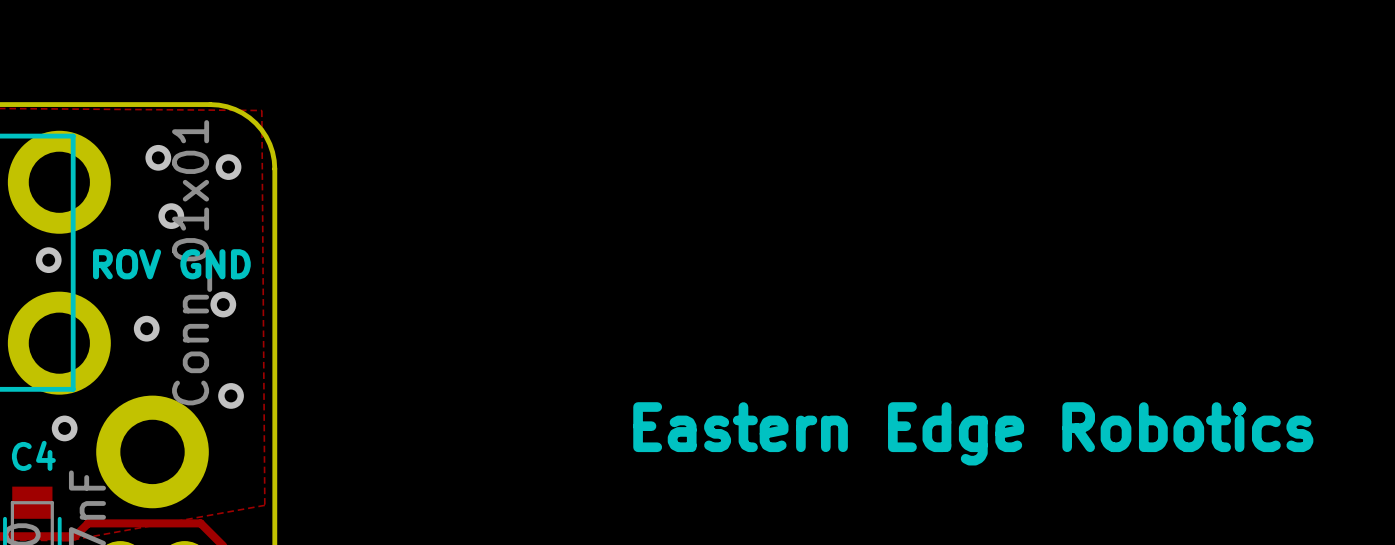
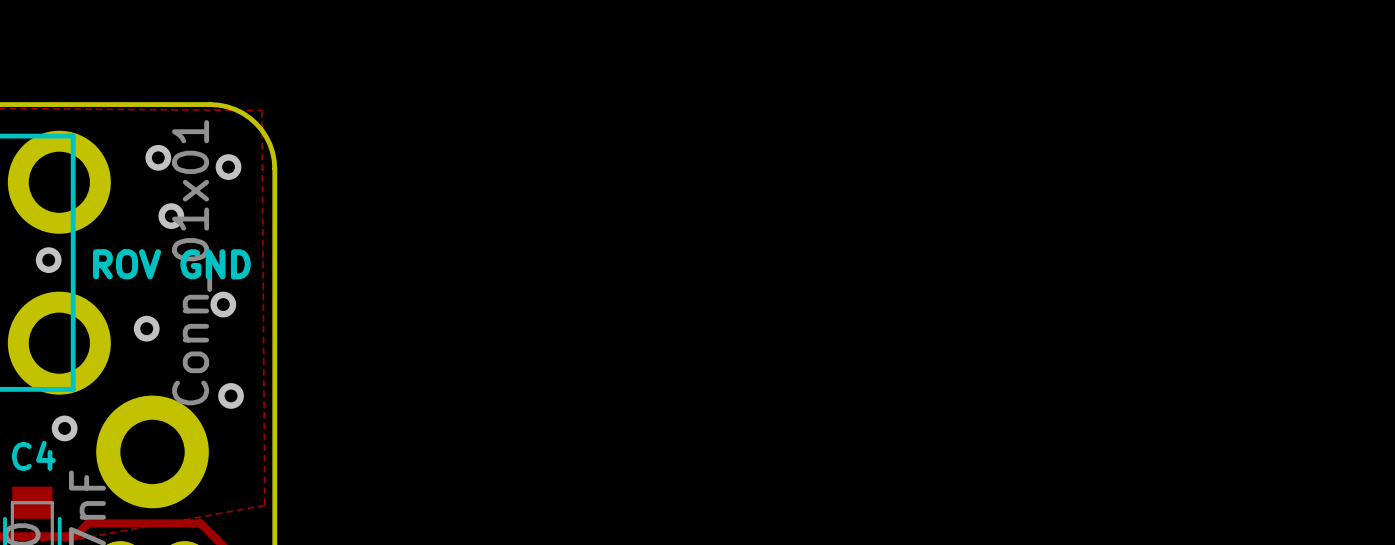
text: Eastern Edge Robotics (973, 433) -> none

